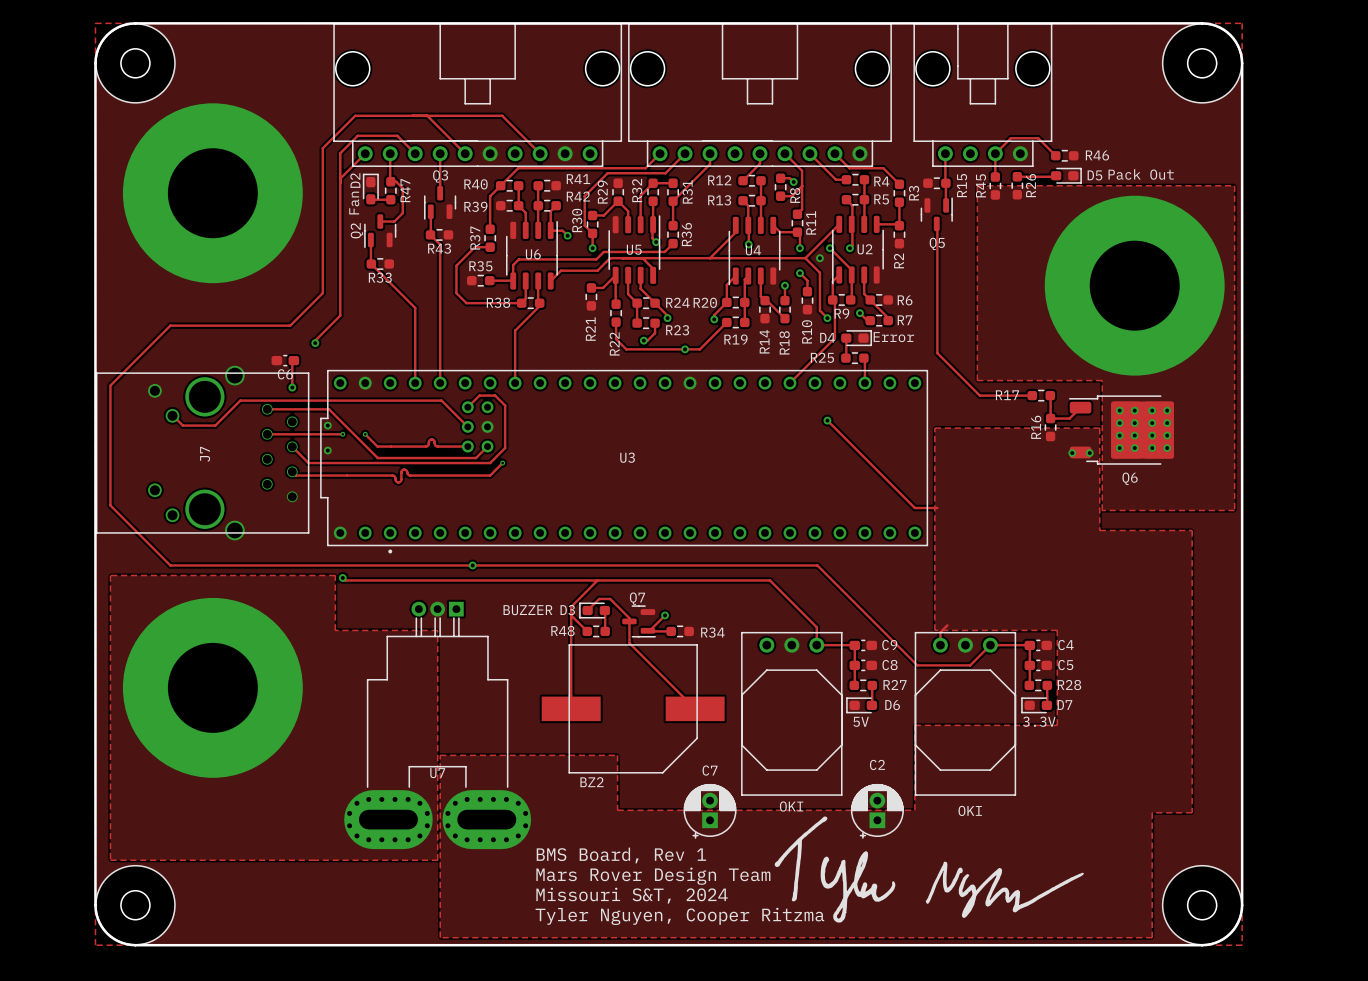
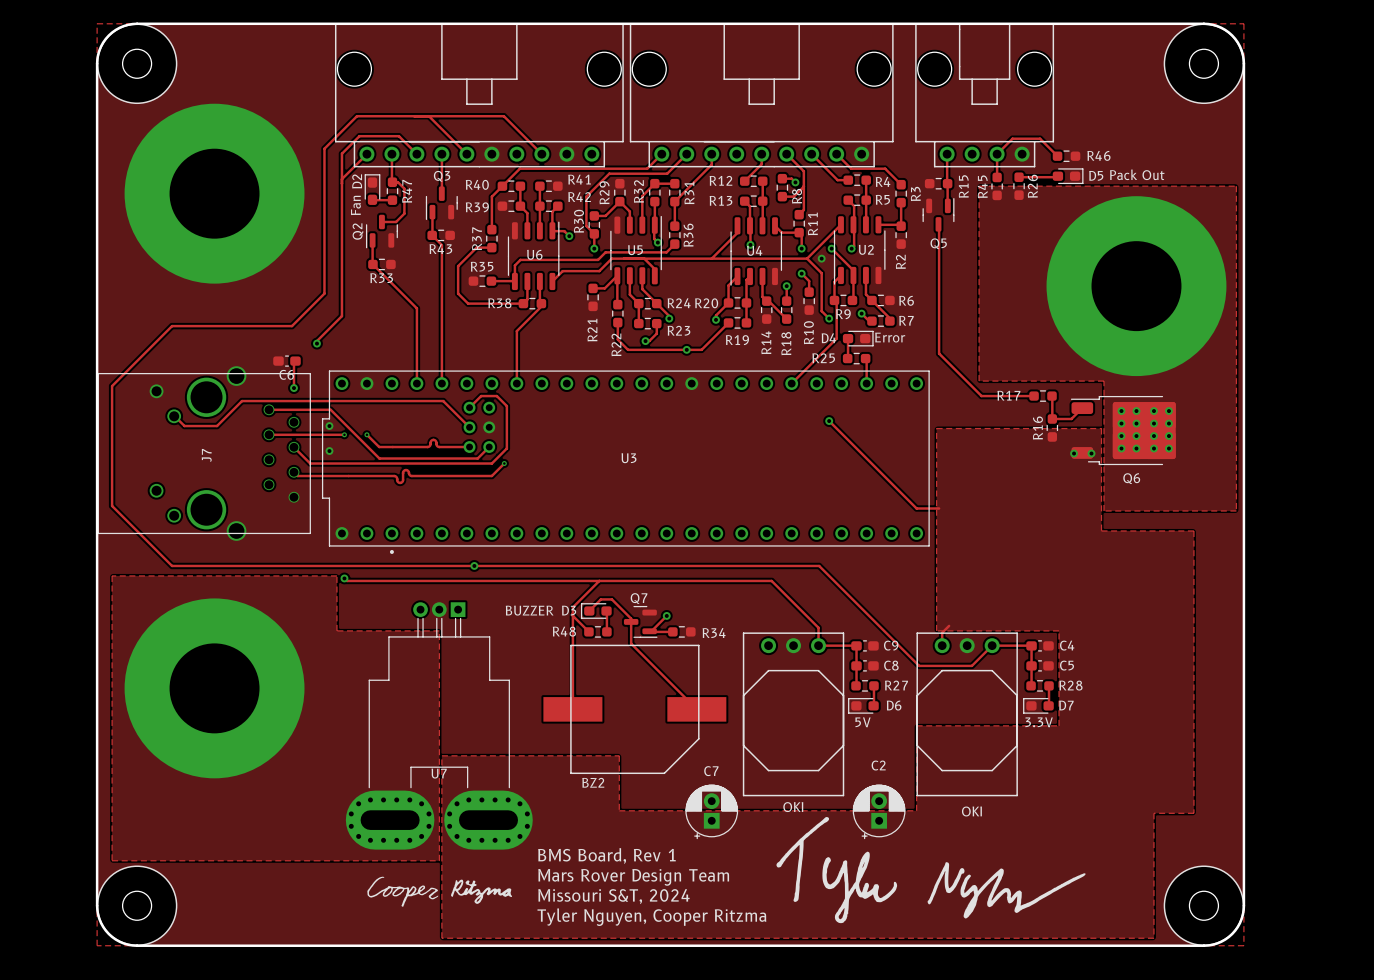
drawing: none -> [367, 876, 513, 907]

